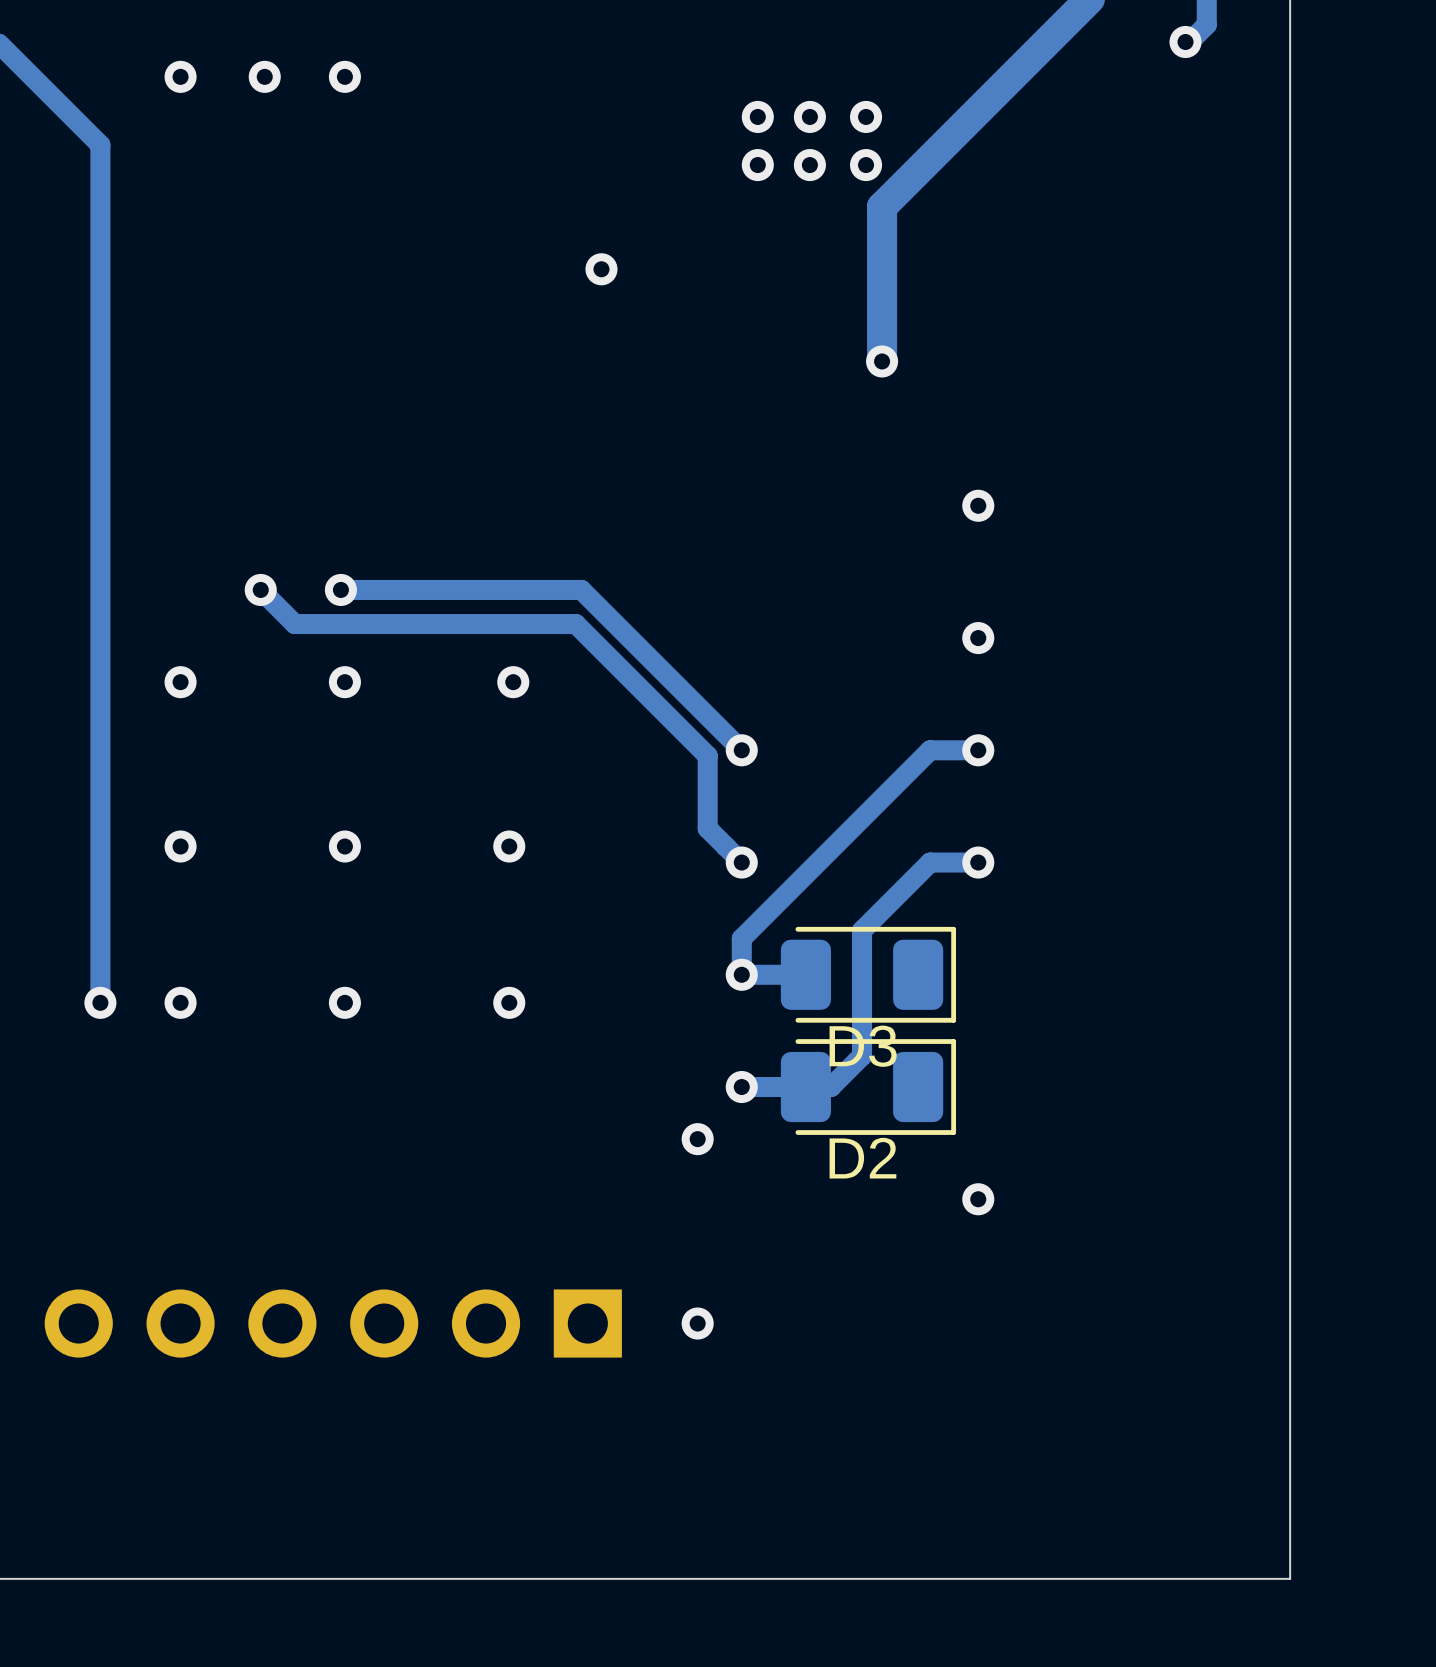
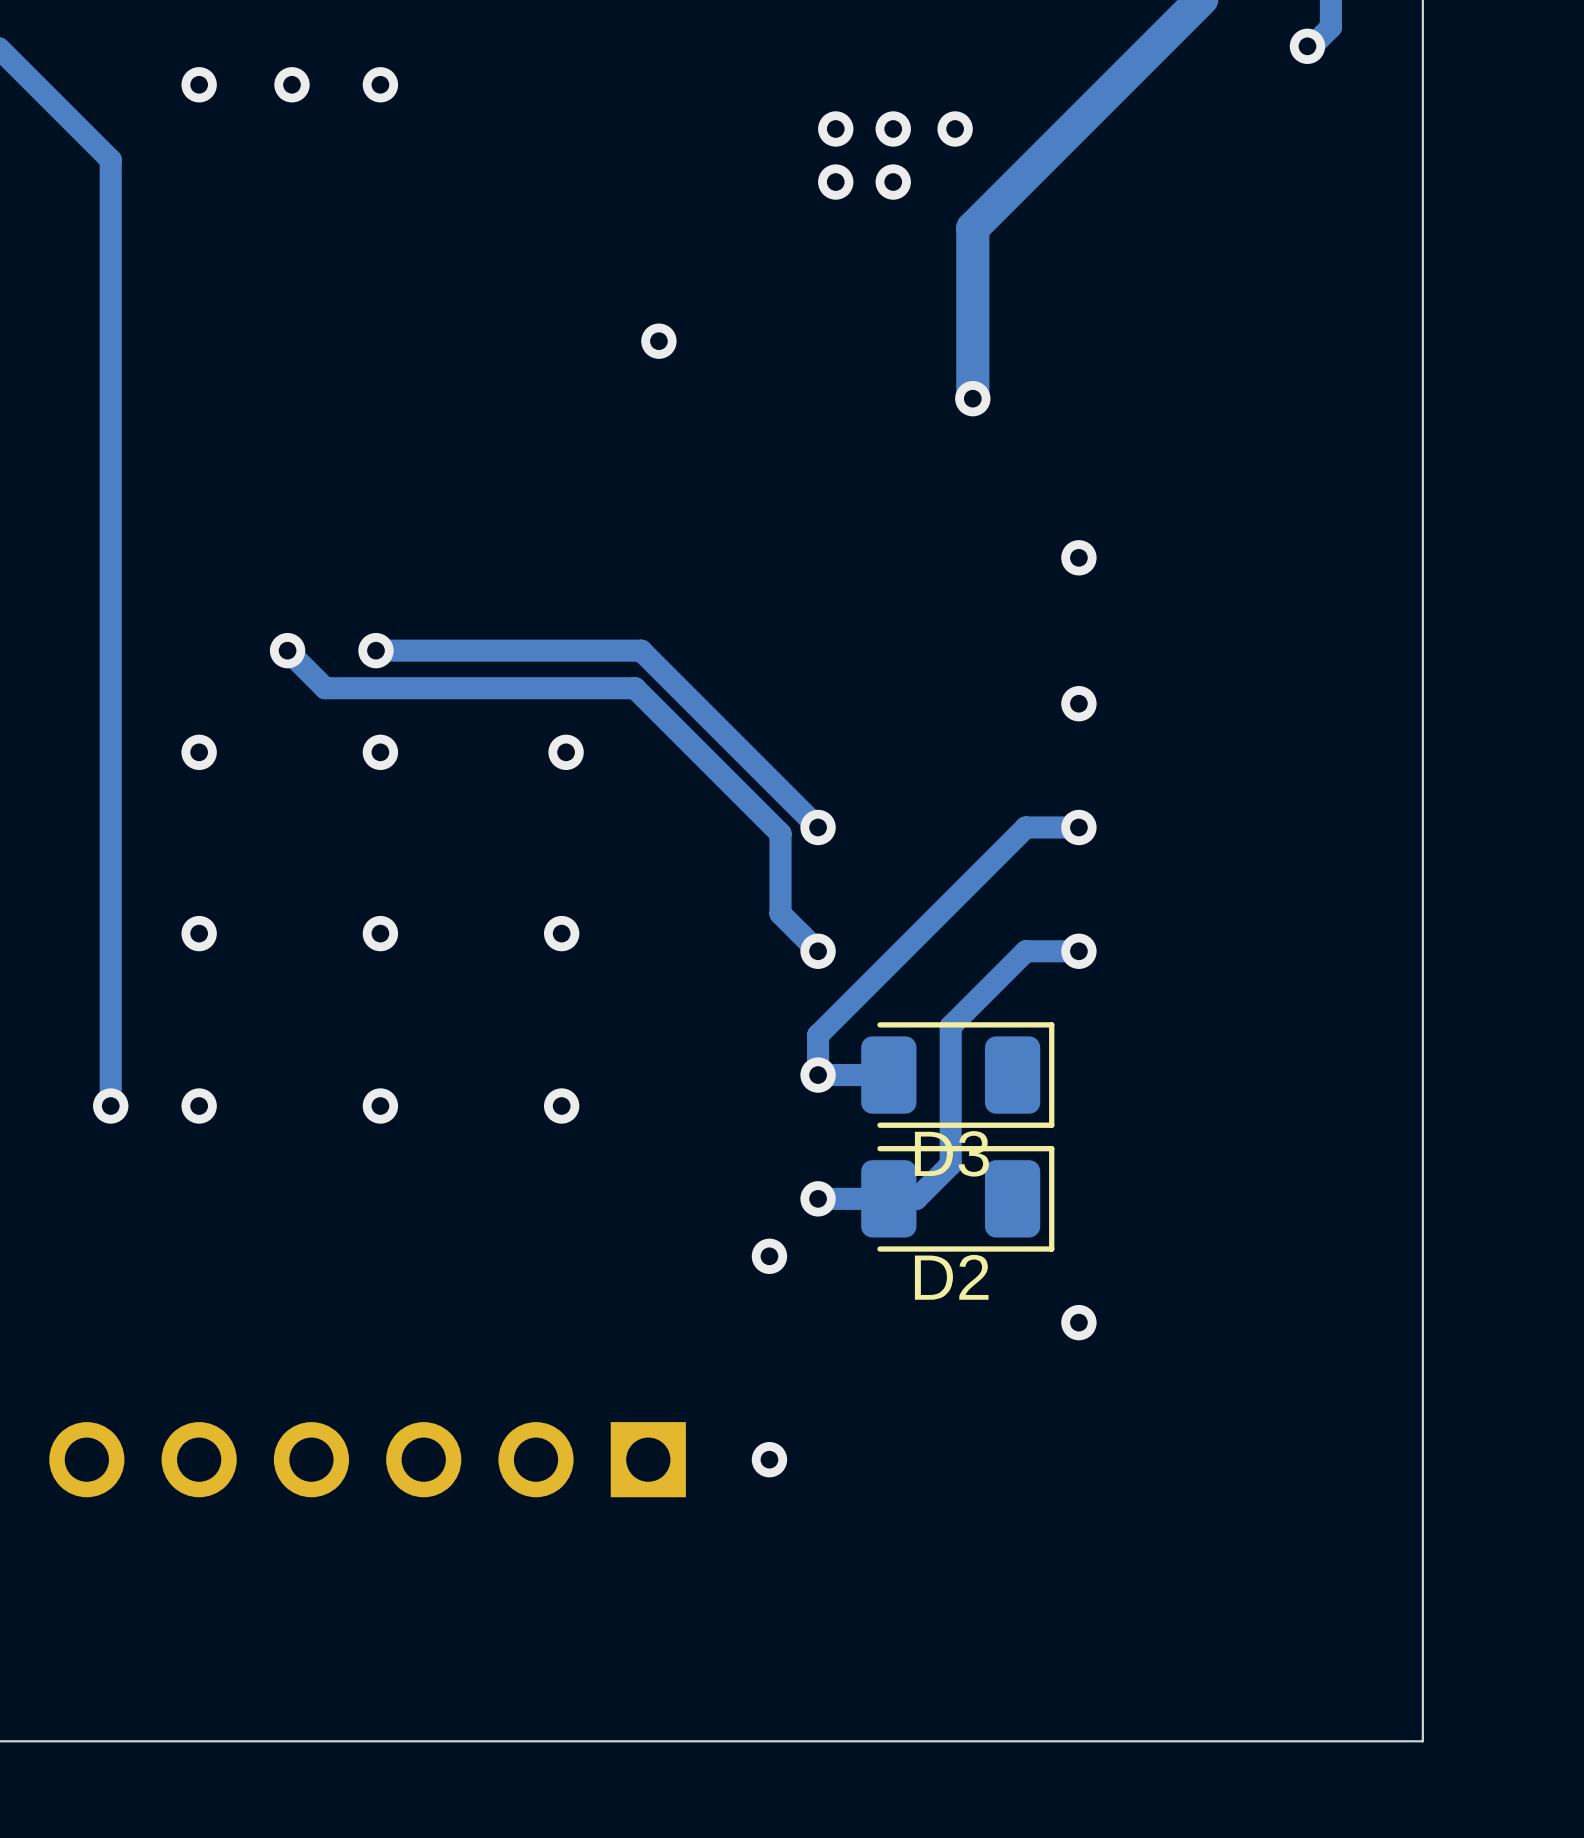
via: (866, 165) -> none
via position: (601, 269) -> (658, 341)

